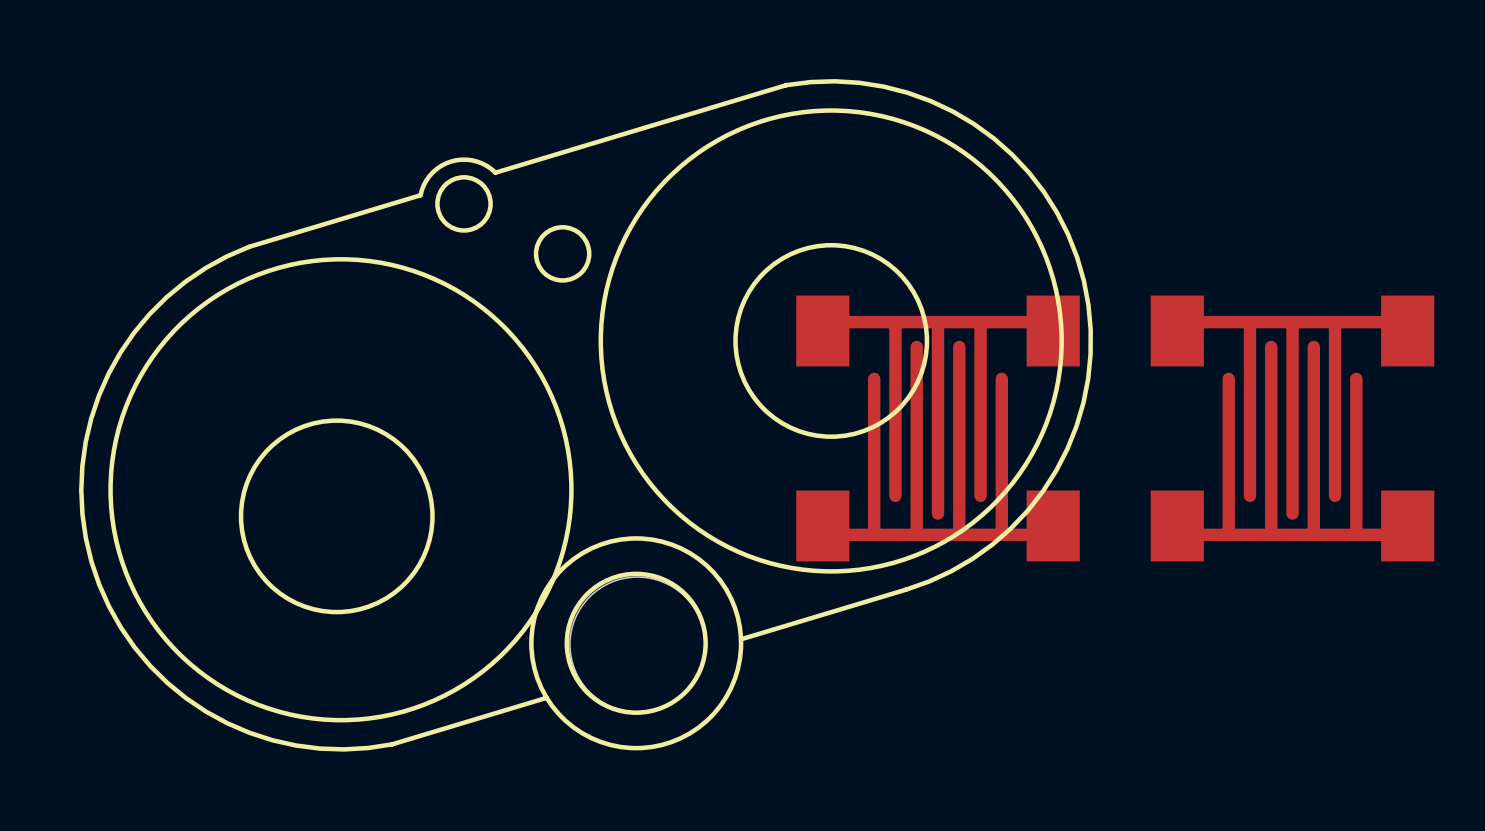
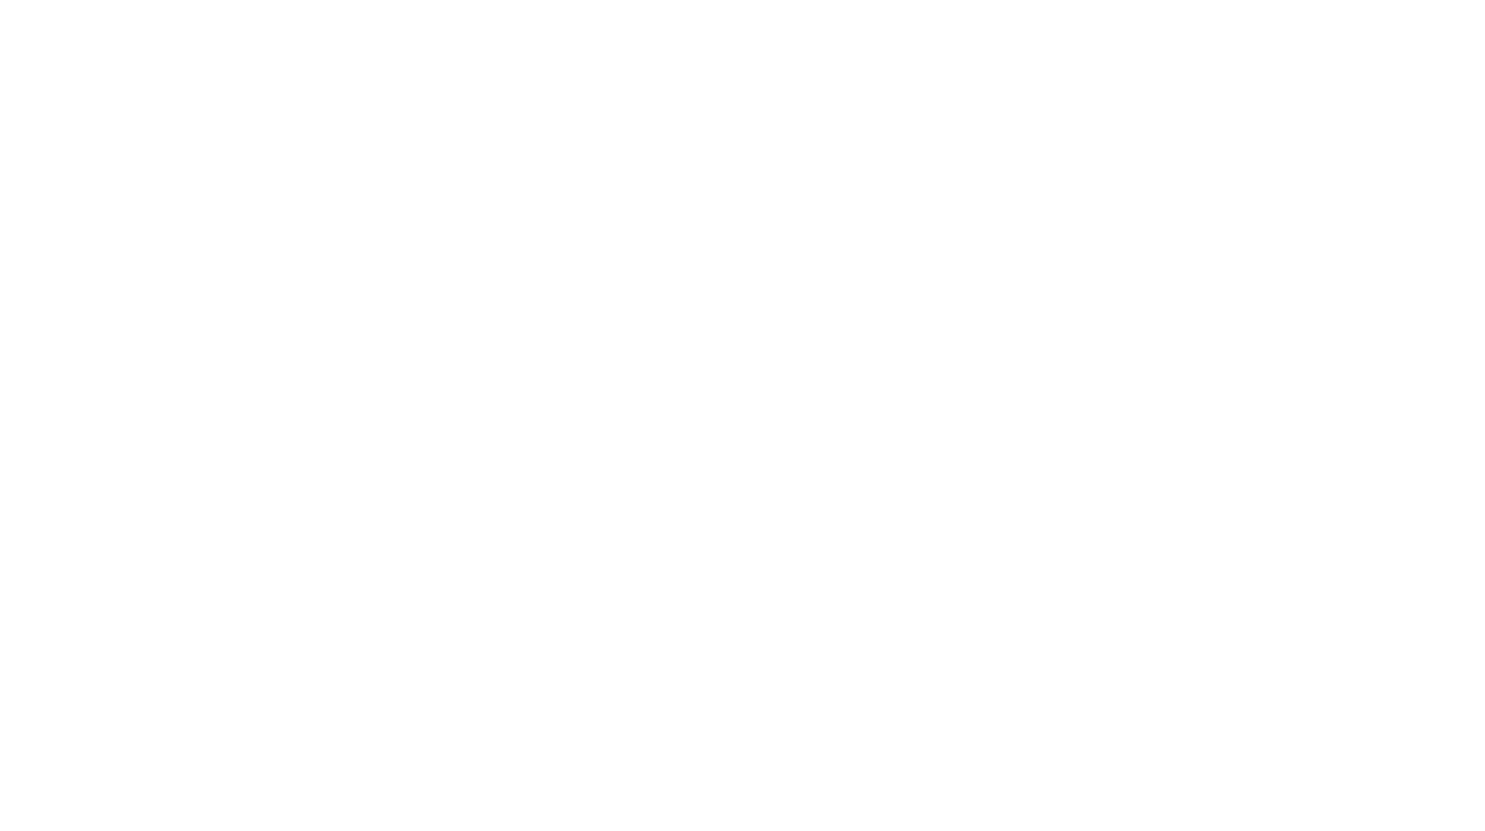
part: (585, 415) -> none
part: (938, 428) -> none
part: (1292, 428) -> none

